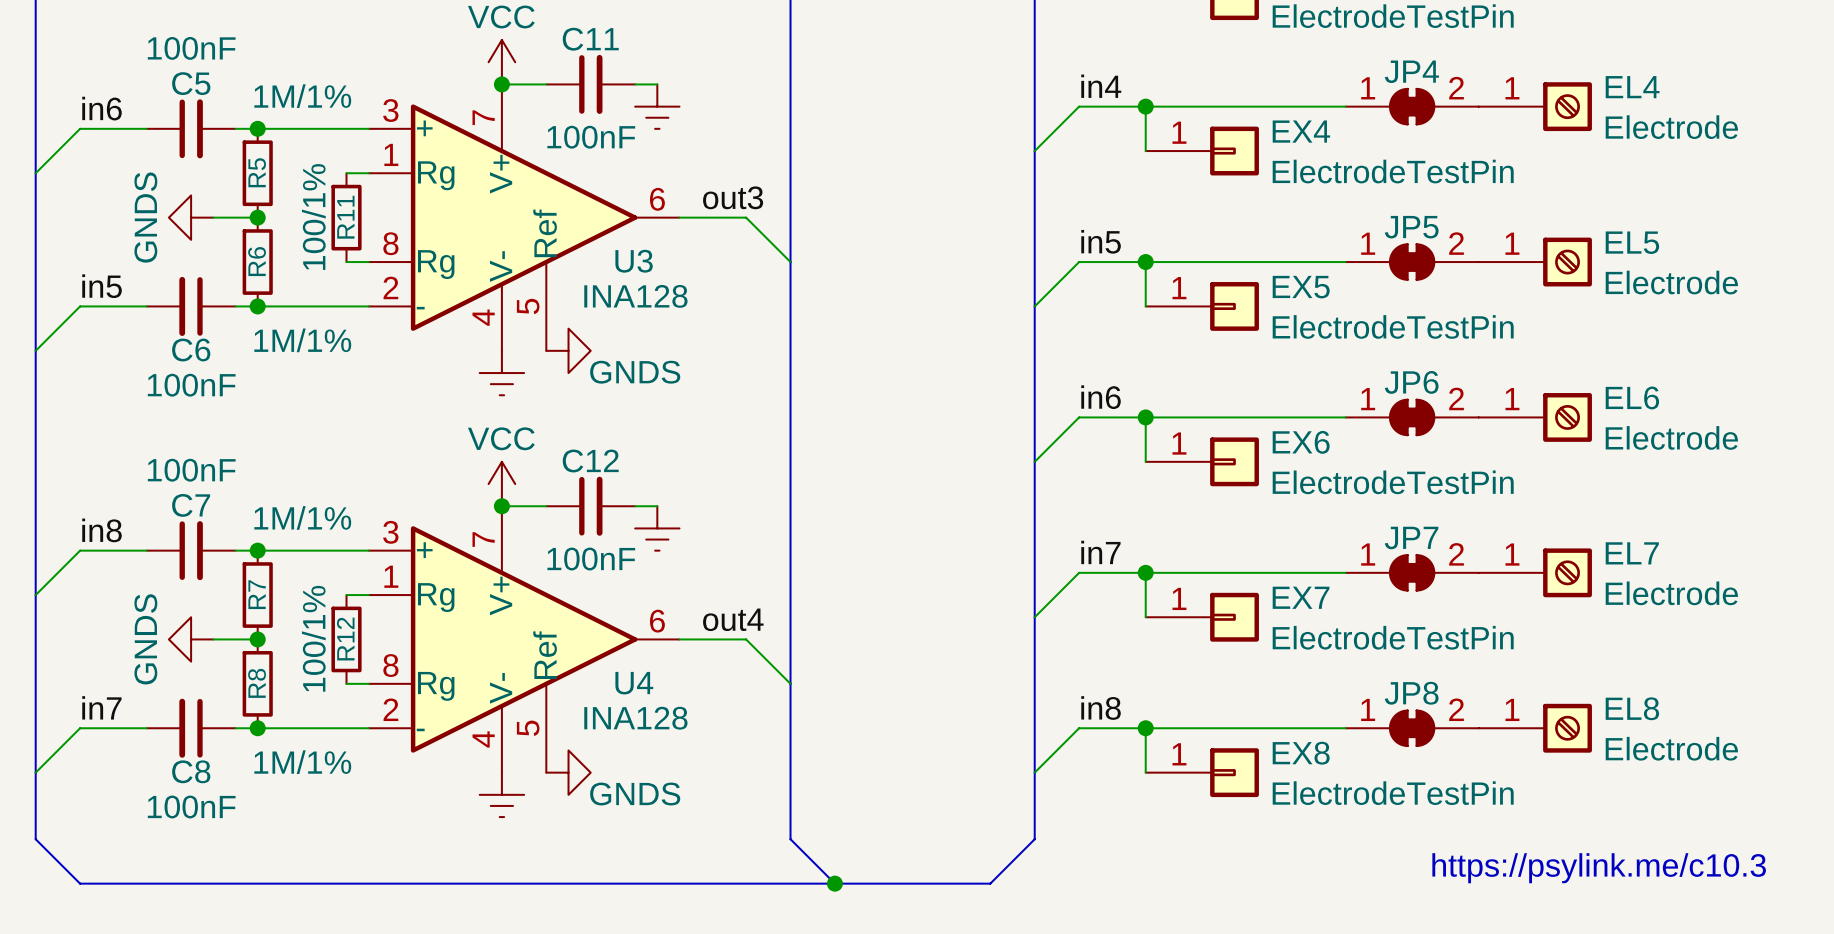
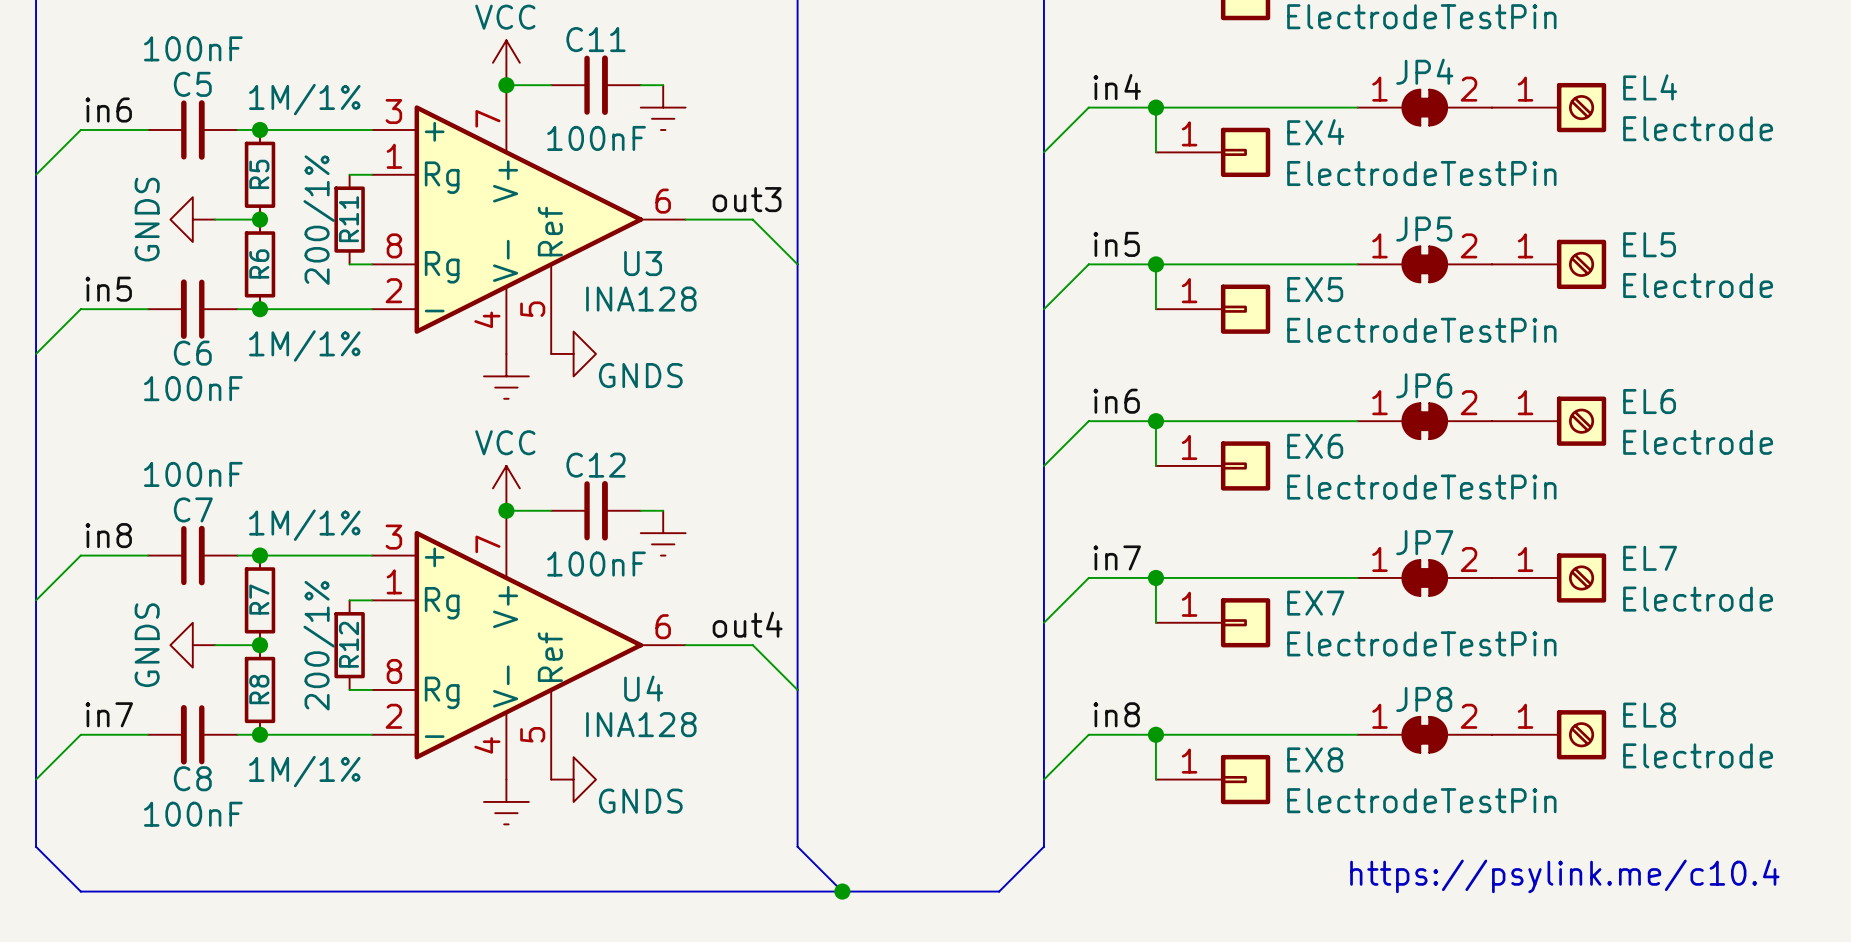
R11 value: 100/1% (313, 216) -> 200/1% (319, 220)
R12 value: 100/1% (313, 638) -> 200/1% (319, 645)
text: https://psylink.me/c10.3 (1599, 868) -> https://psylink.me/c10.4 (1564, 876)

